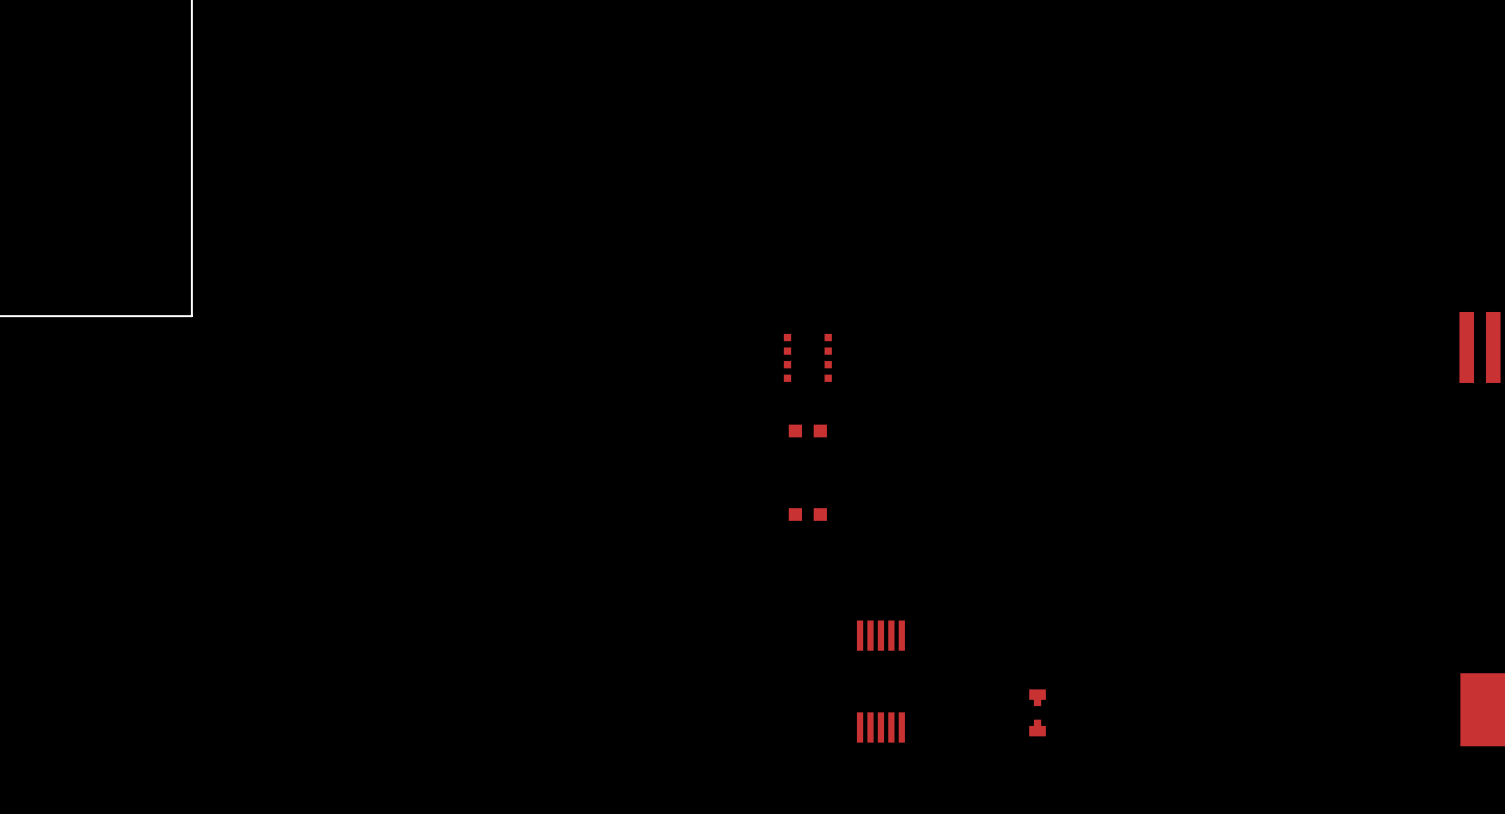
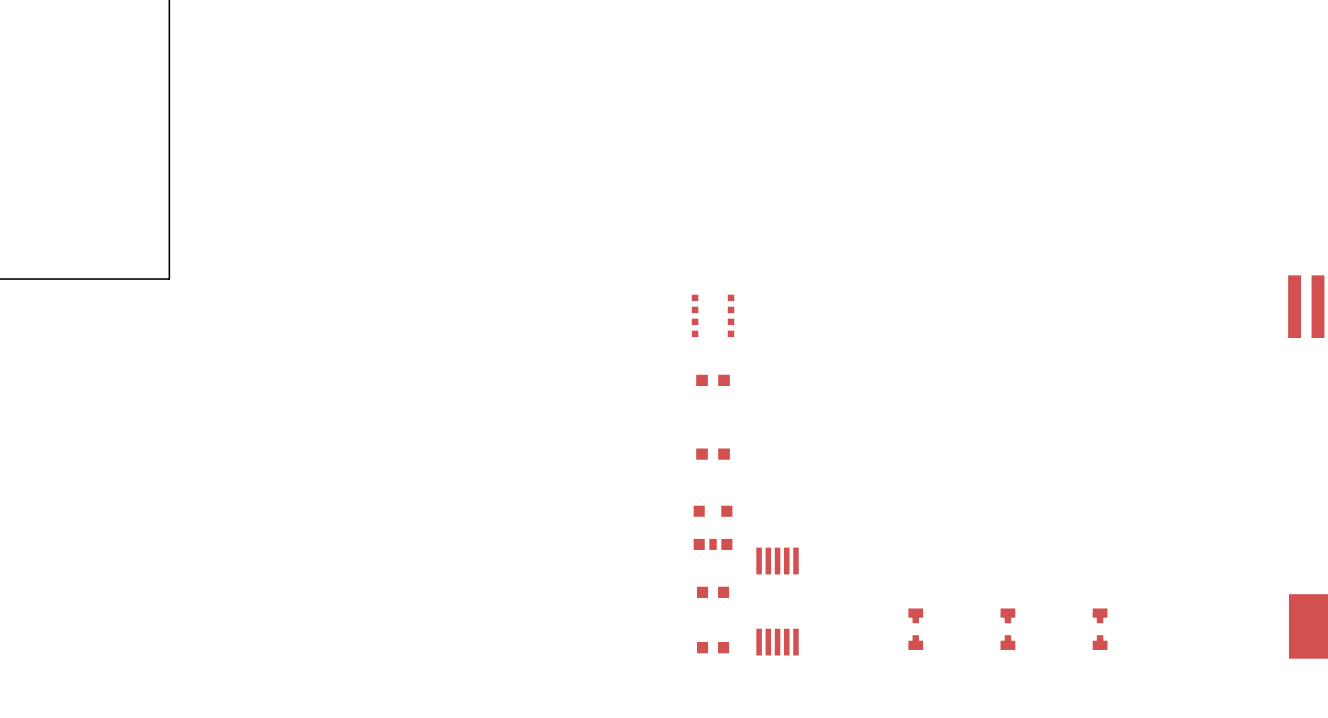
part: none -> (713, 527)
part: none -> (713, 592)
part: none -> (1007, 629)
part: none -> (1100, 629)
part: none -> (713, 647)

